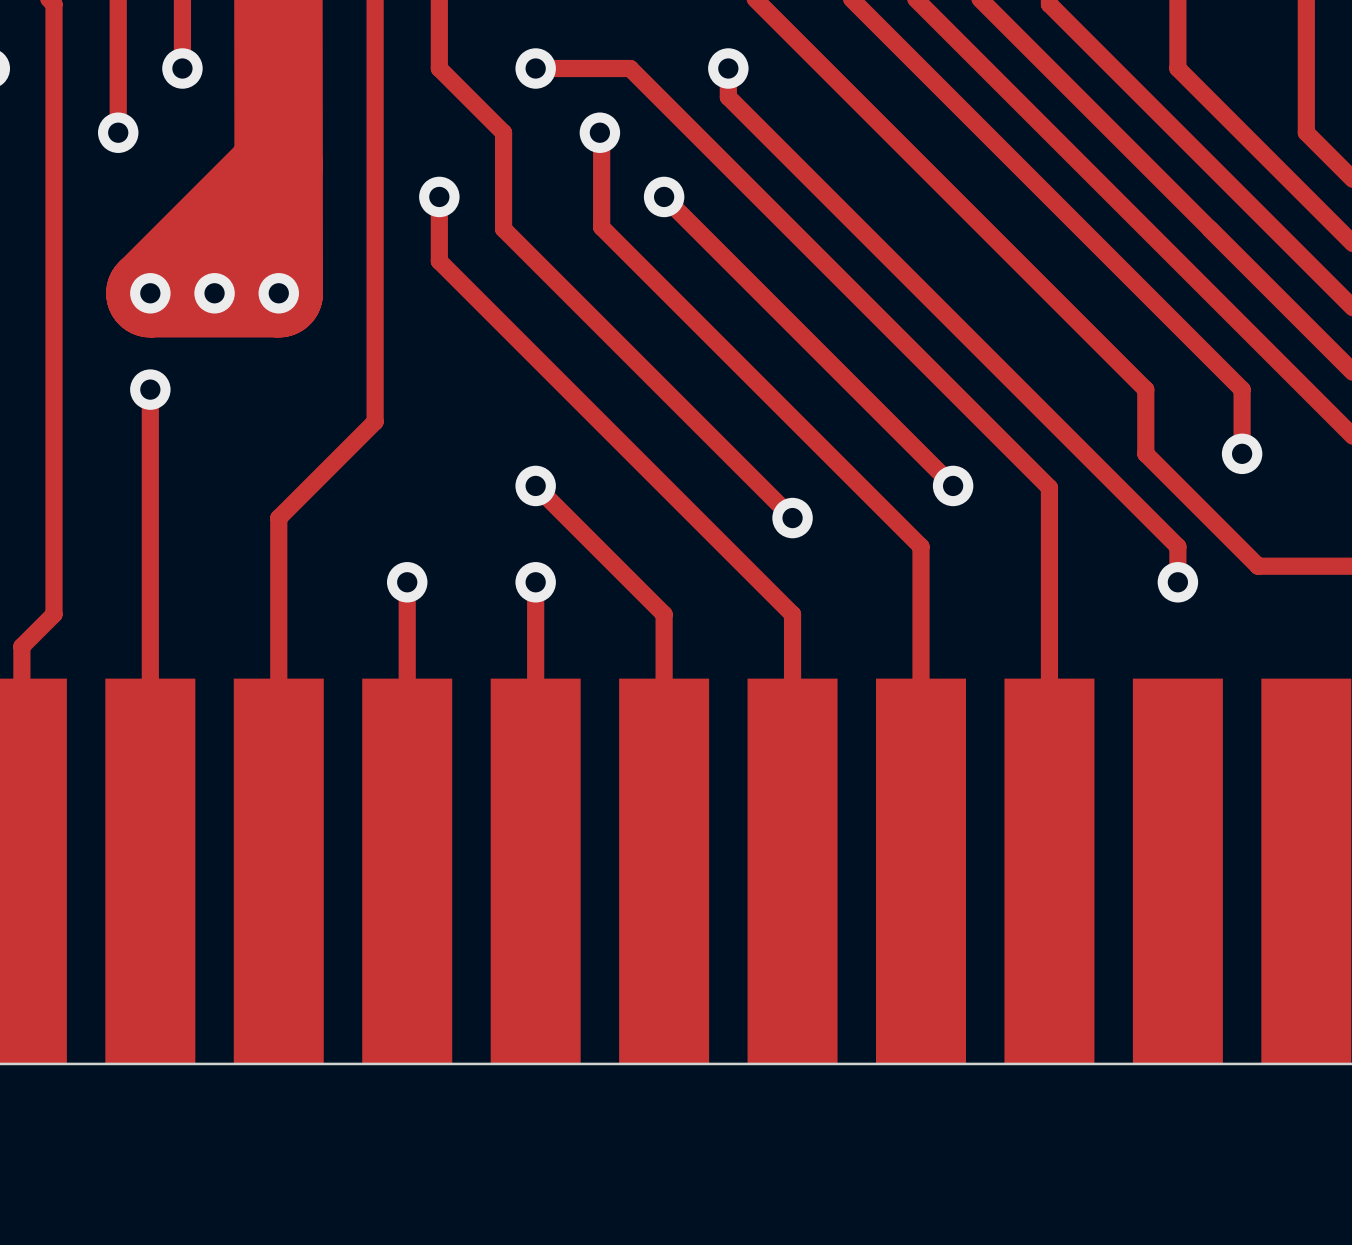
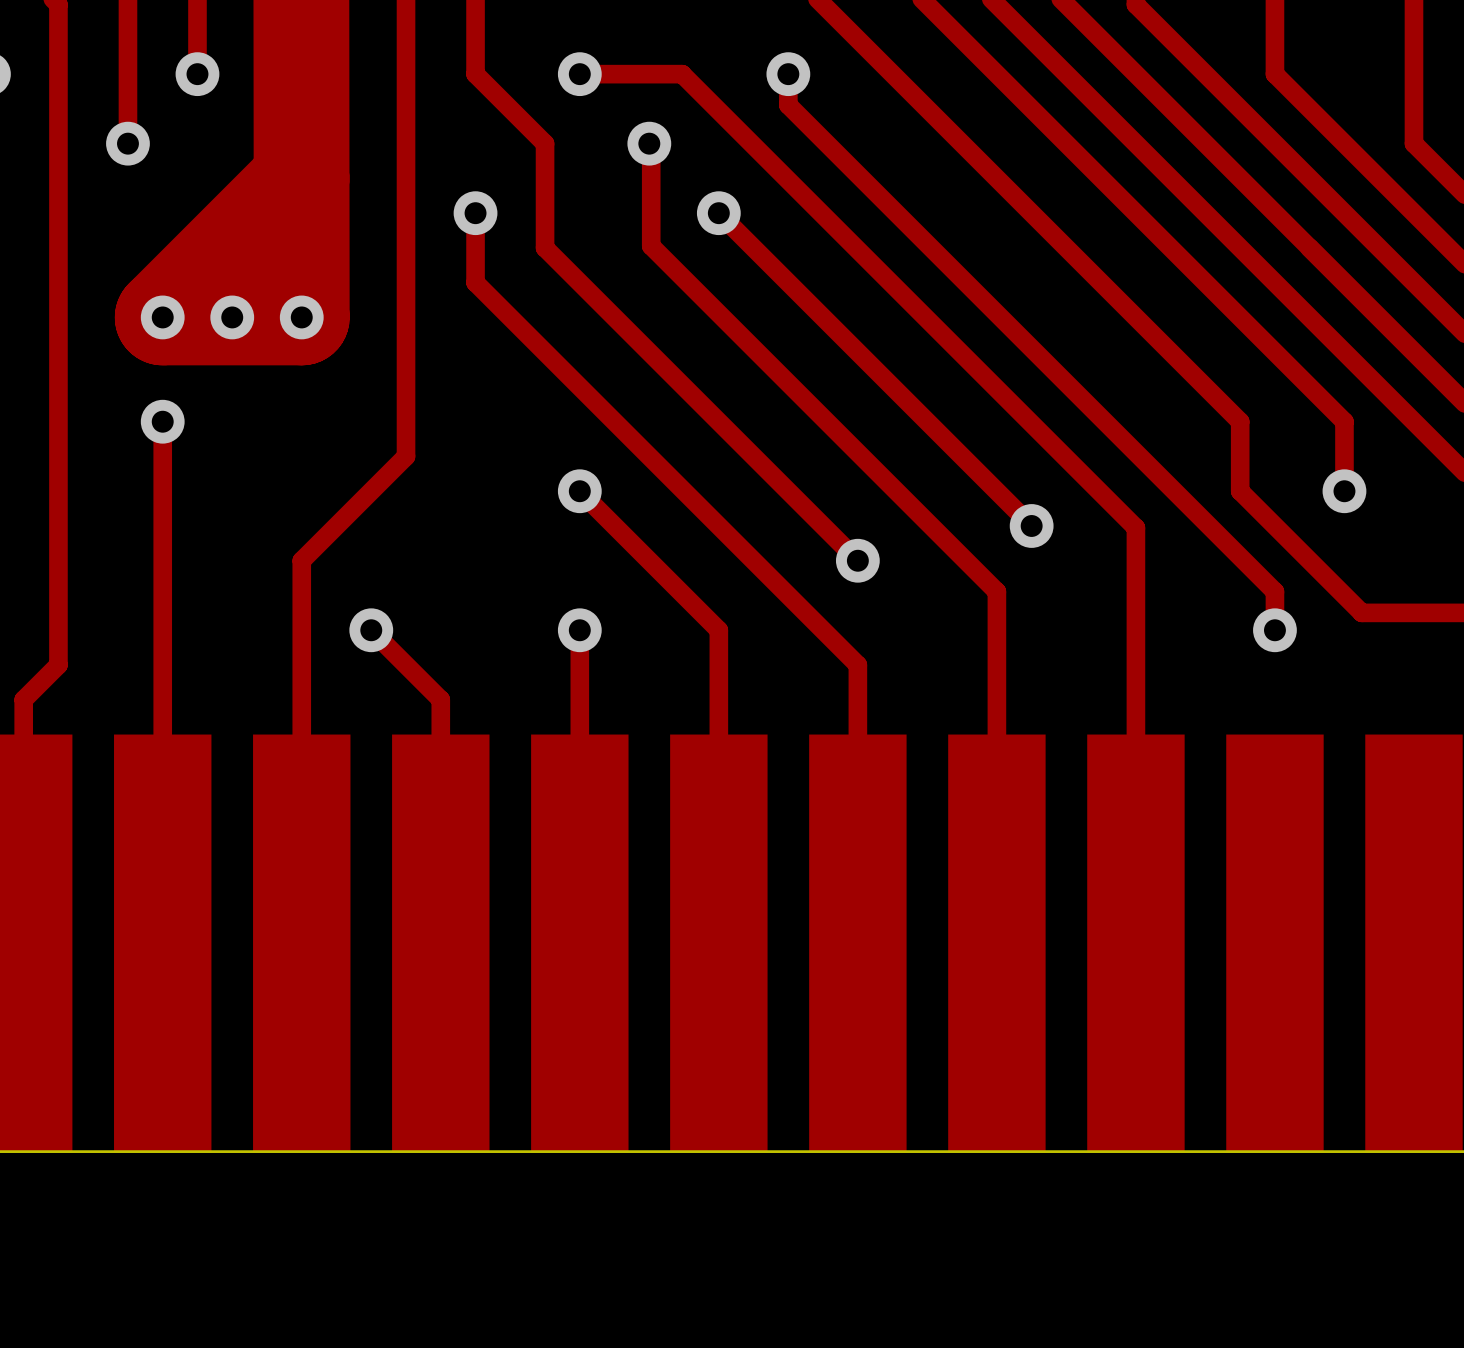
track: (535, 485) (664, 614) -> (579, 491) (718, 630) (718, 665)
via position: (535, 485) -> (579, 491)
track: (407, 582) (407, 646) -> (371, 630) (440, 699)
via position: (407, 582) -> (371, 630)

